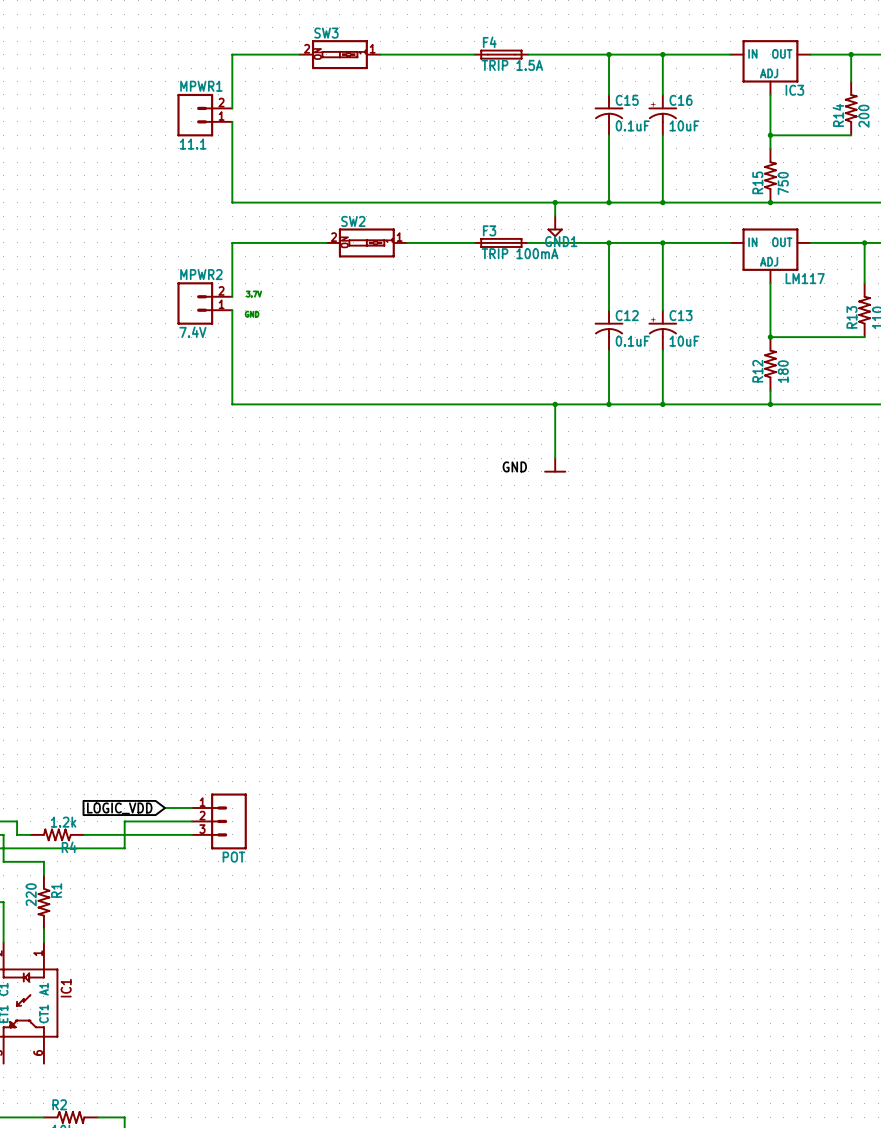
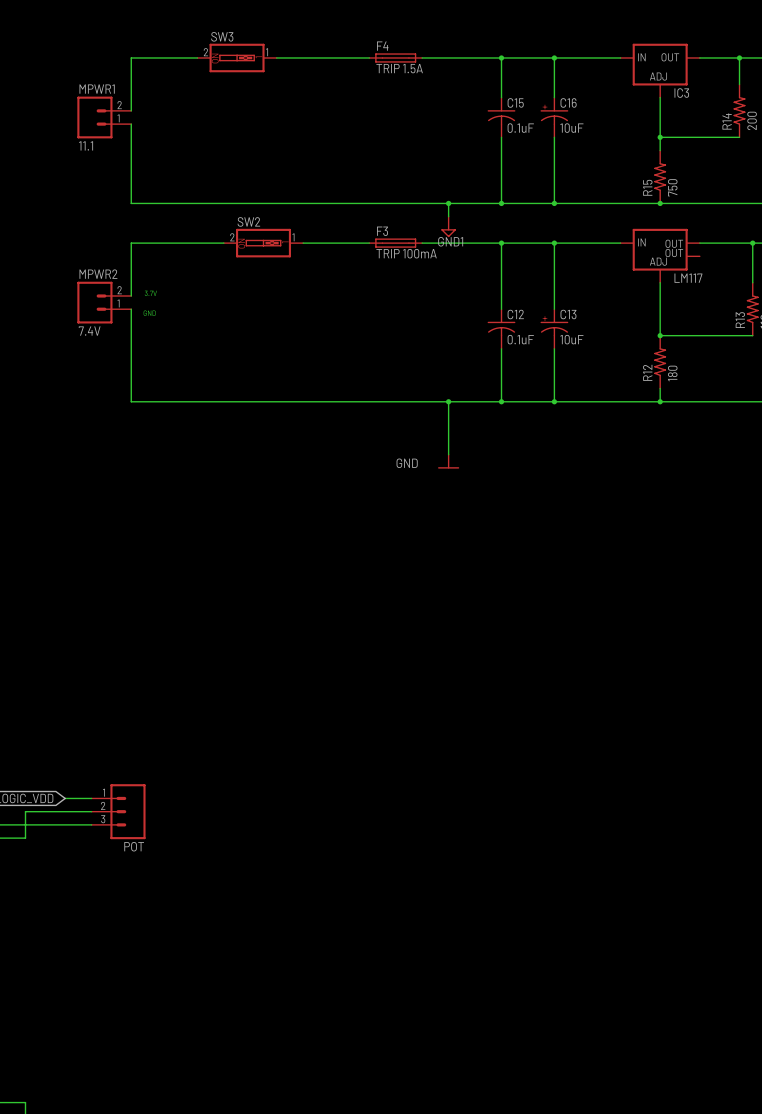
LM117 symbol: [730, 228, 811, 284] -> [620, 228, 700, 283]

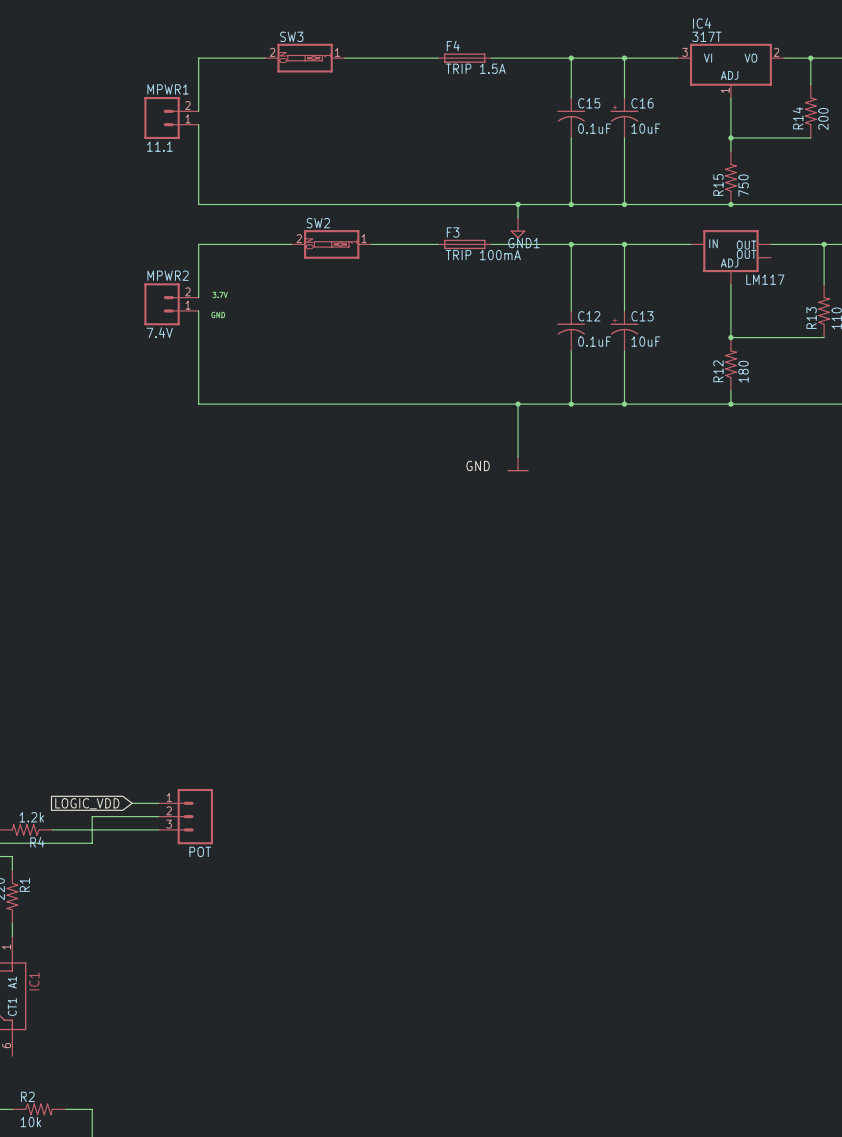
IC3: (660, 70) -> none
IC4: none -> 317T (730, 70)

